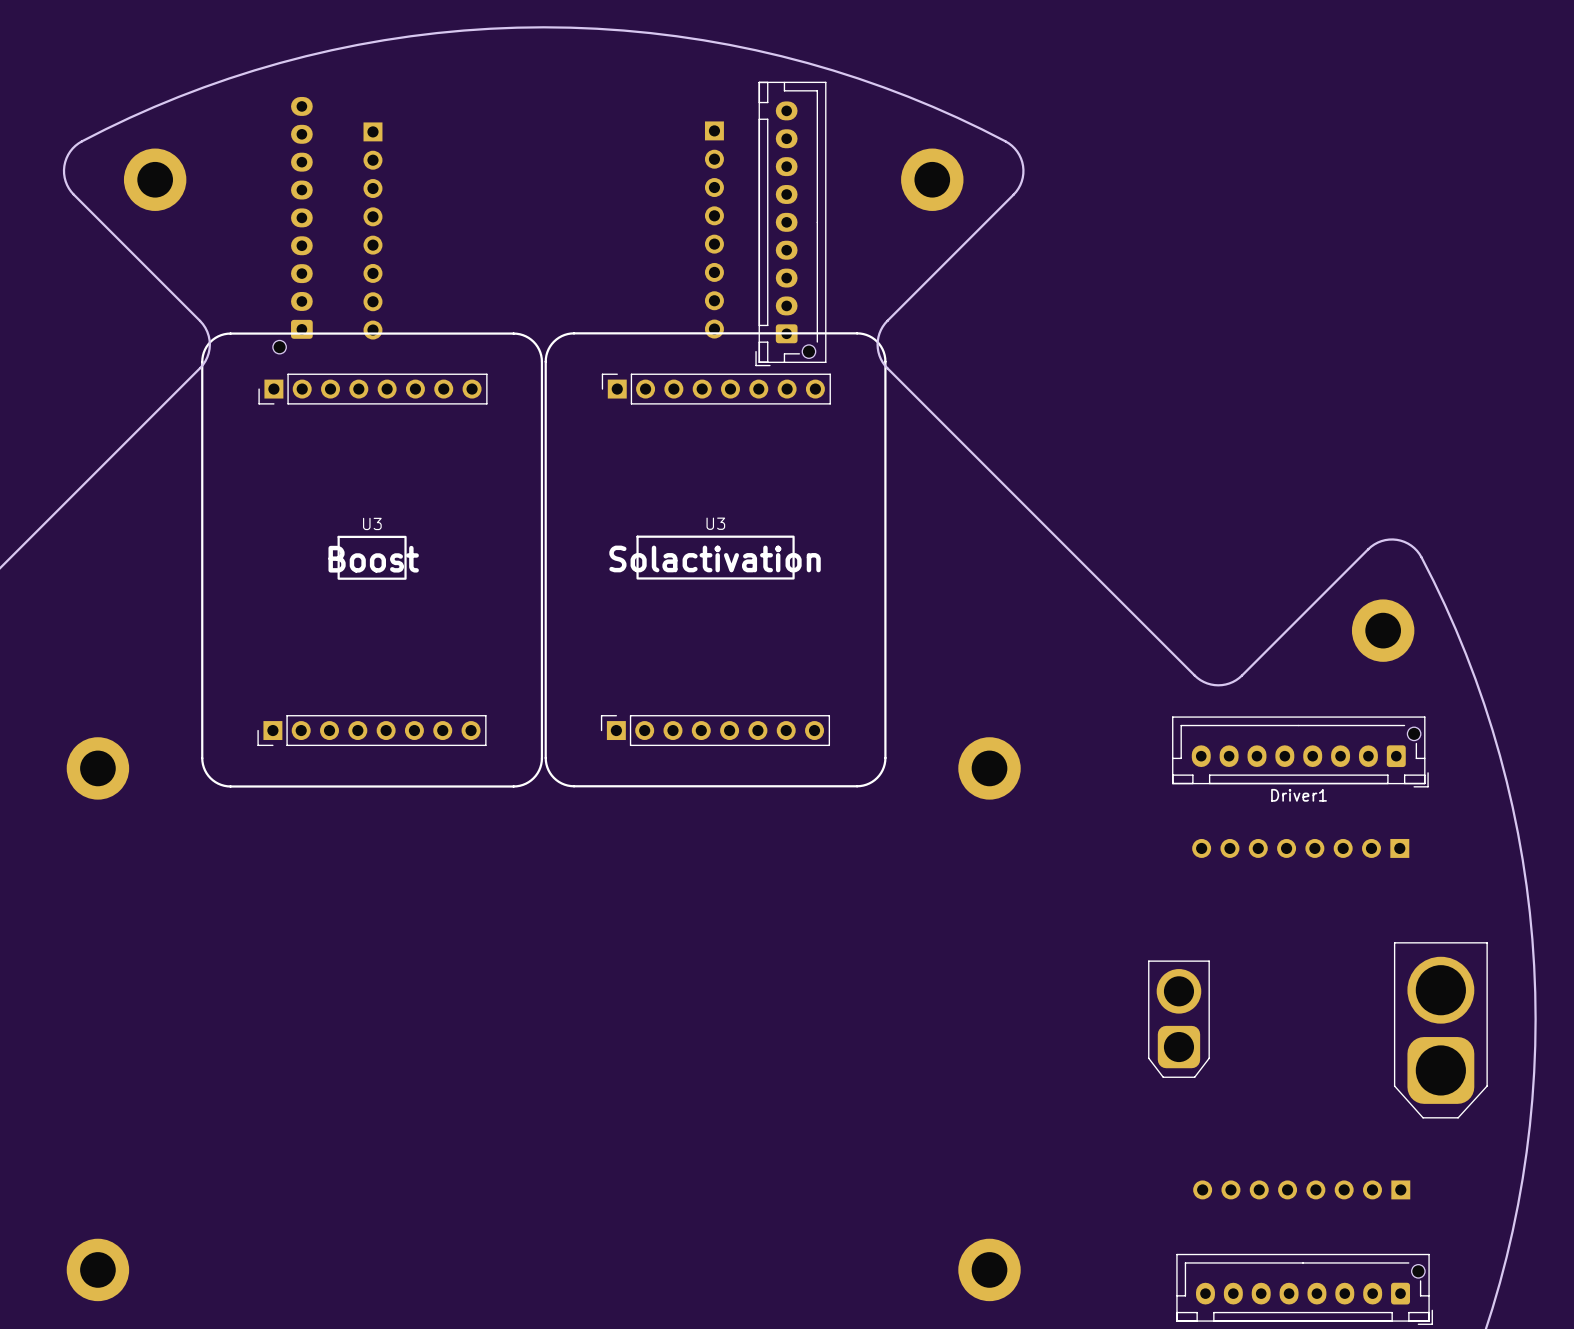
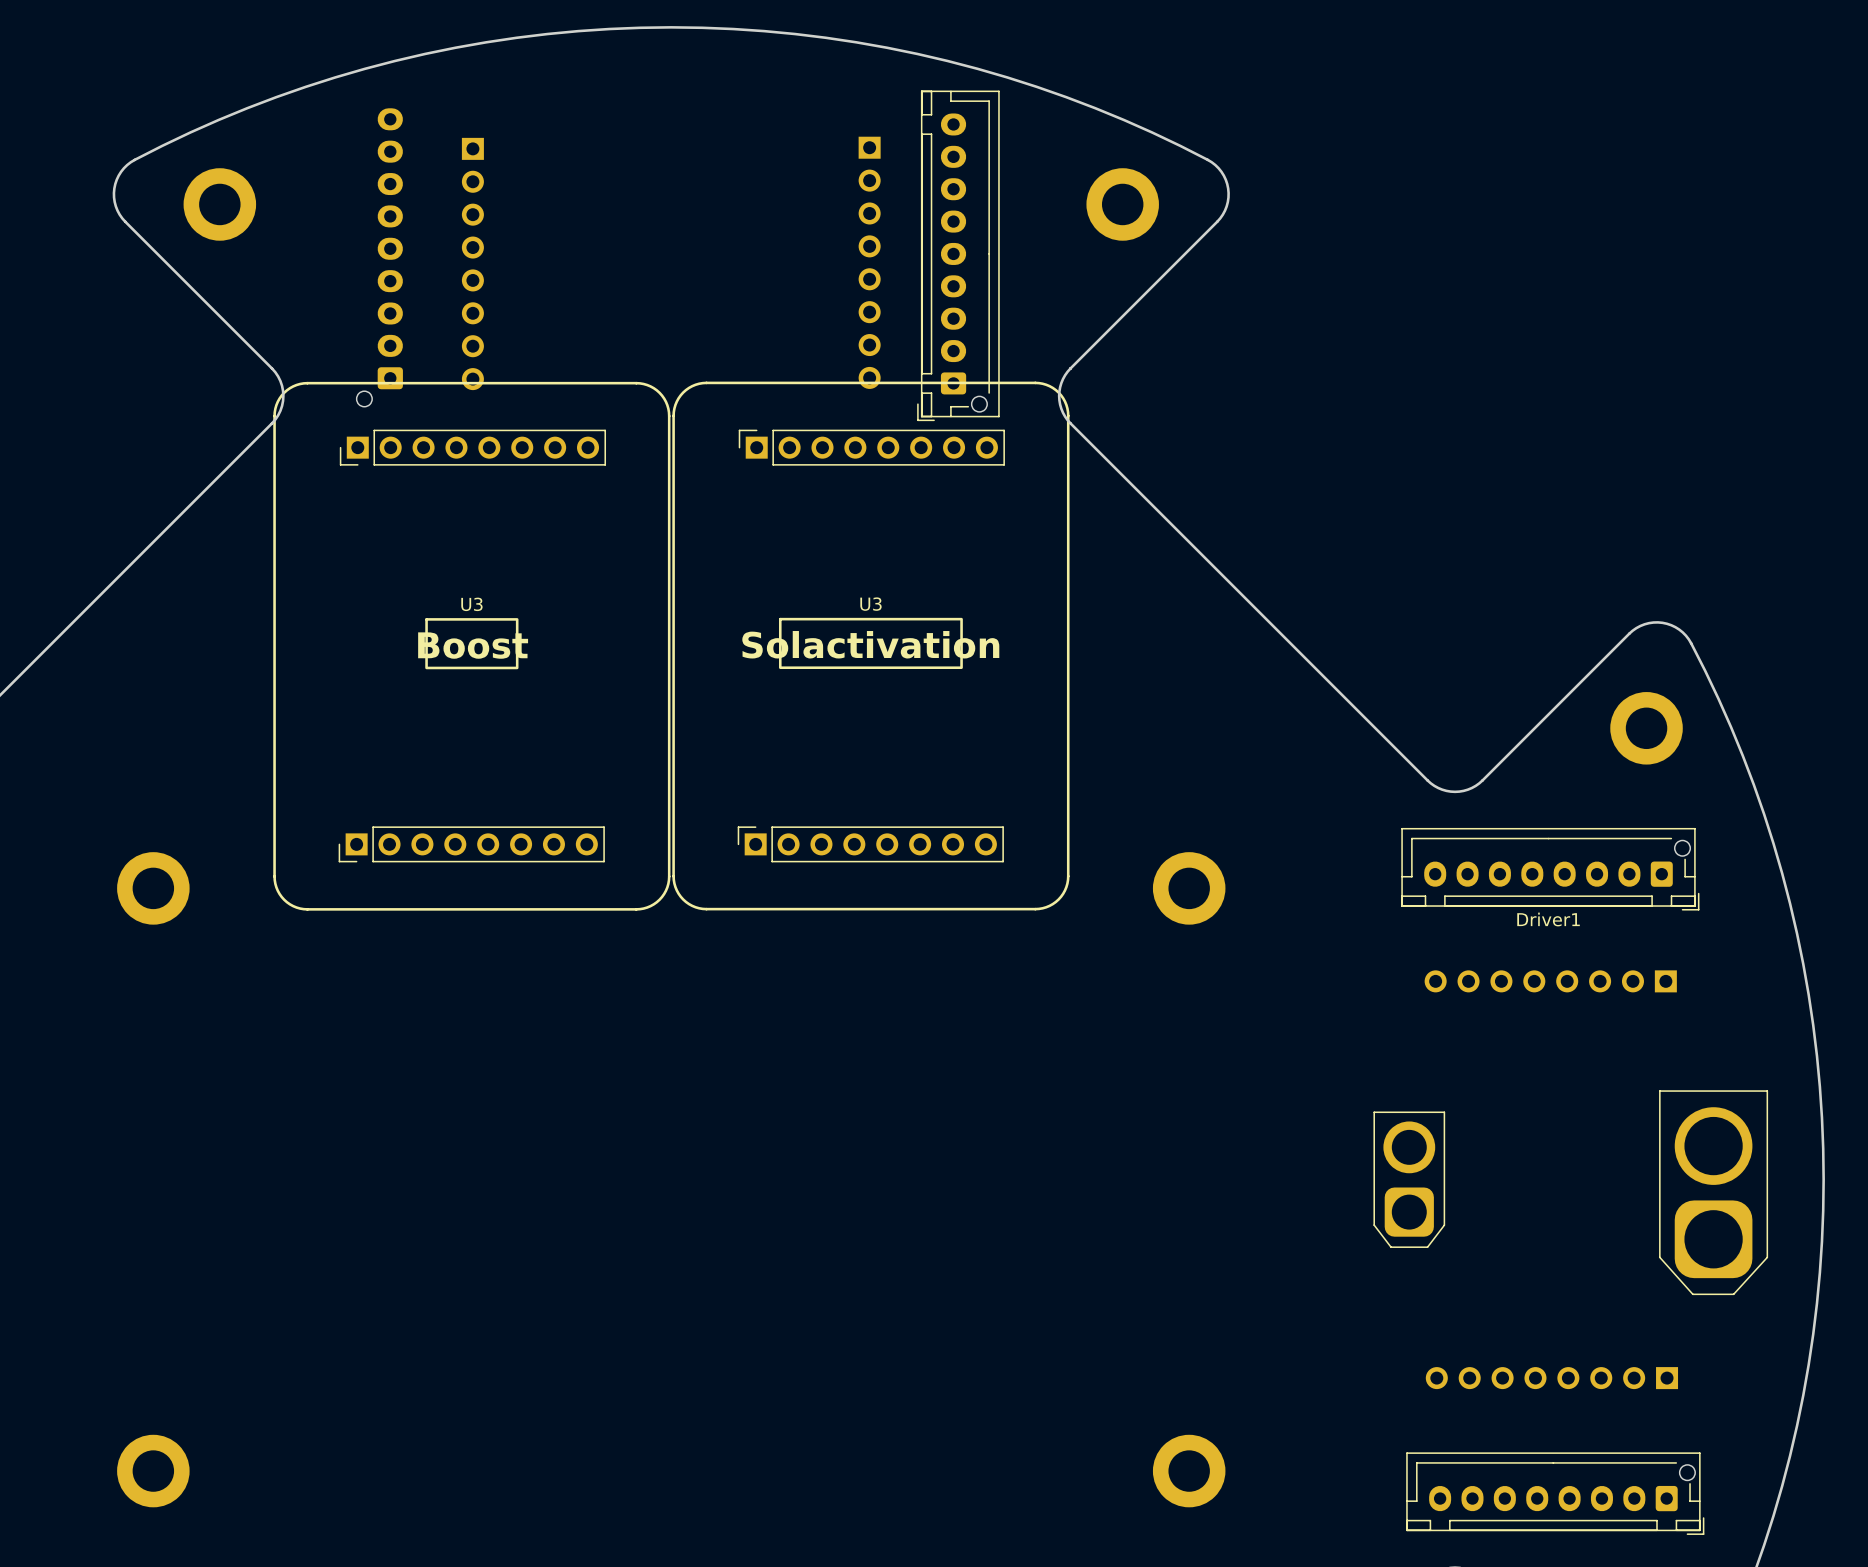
U3 footprint: [201, 332, 544, 788] -> [273, 381, 671, 911]

